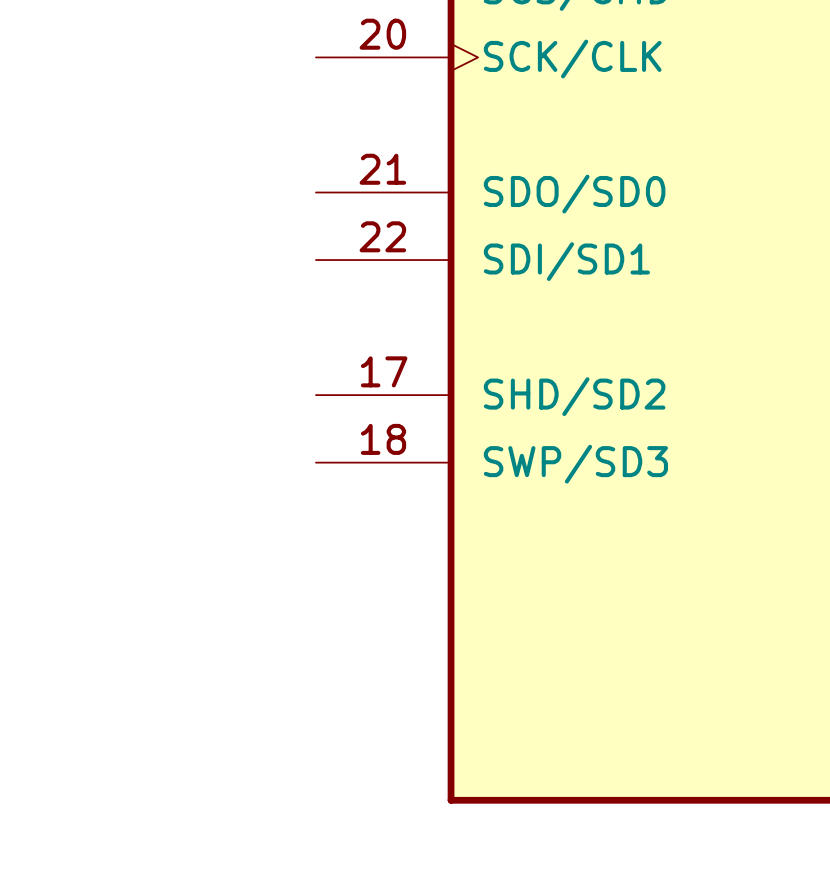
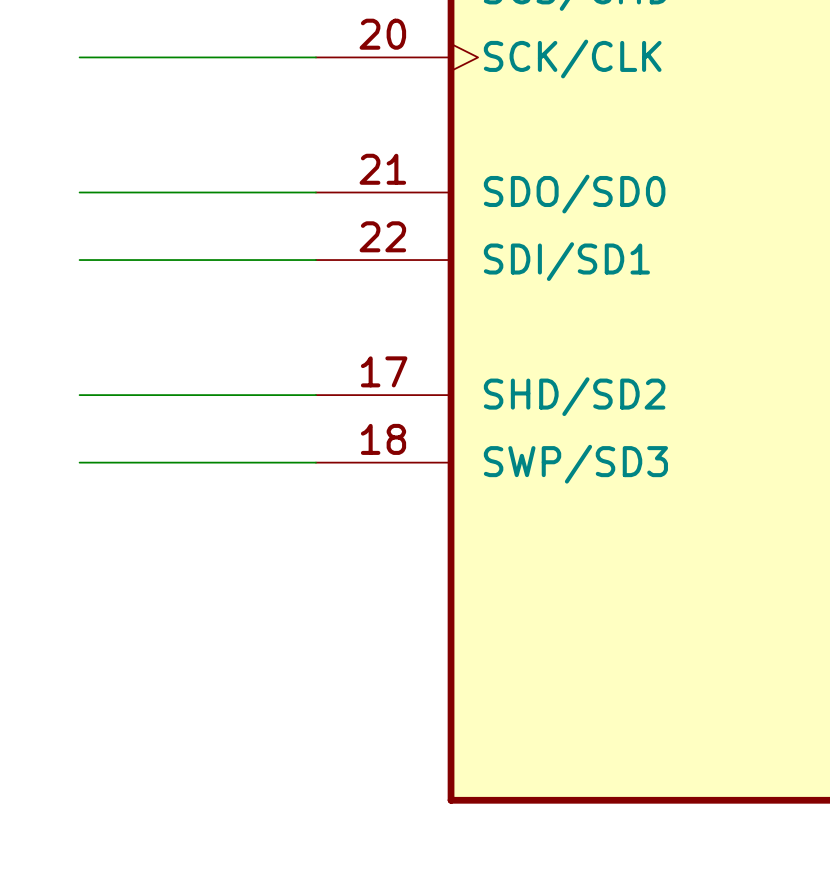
wire: none -> (79, 57) (315, 57)
wire: none -> (79, 192) (315, 192)
wire: none -> (79, 260) (315, 260)
wire: none -> (79, 395) (315, 395)
wire: none -> (79, 462) (315, 462)

